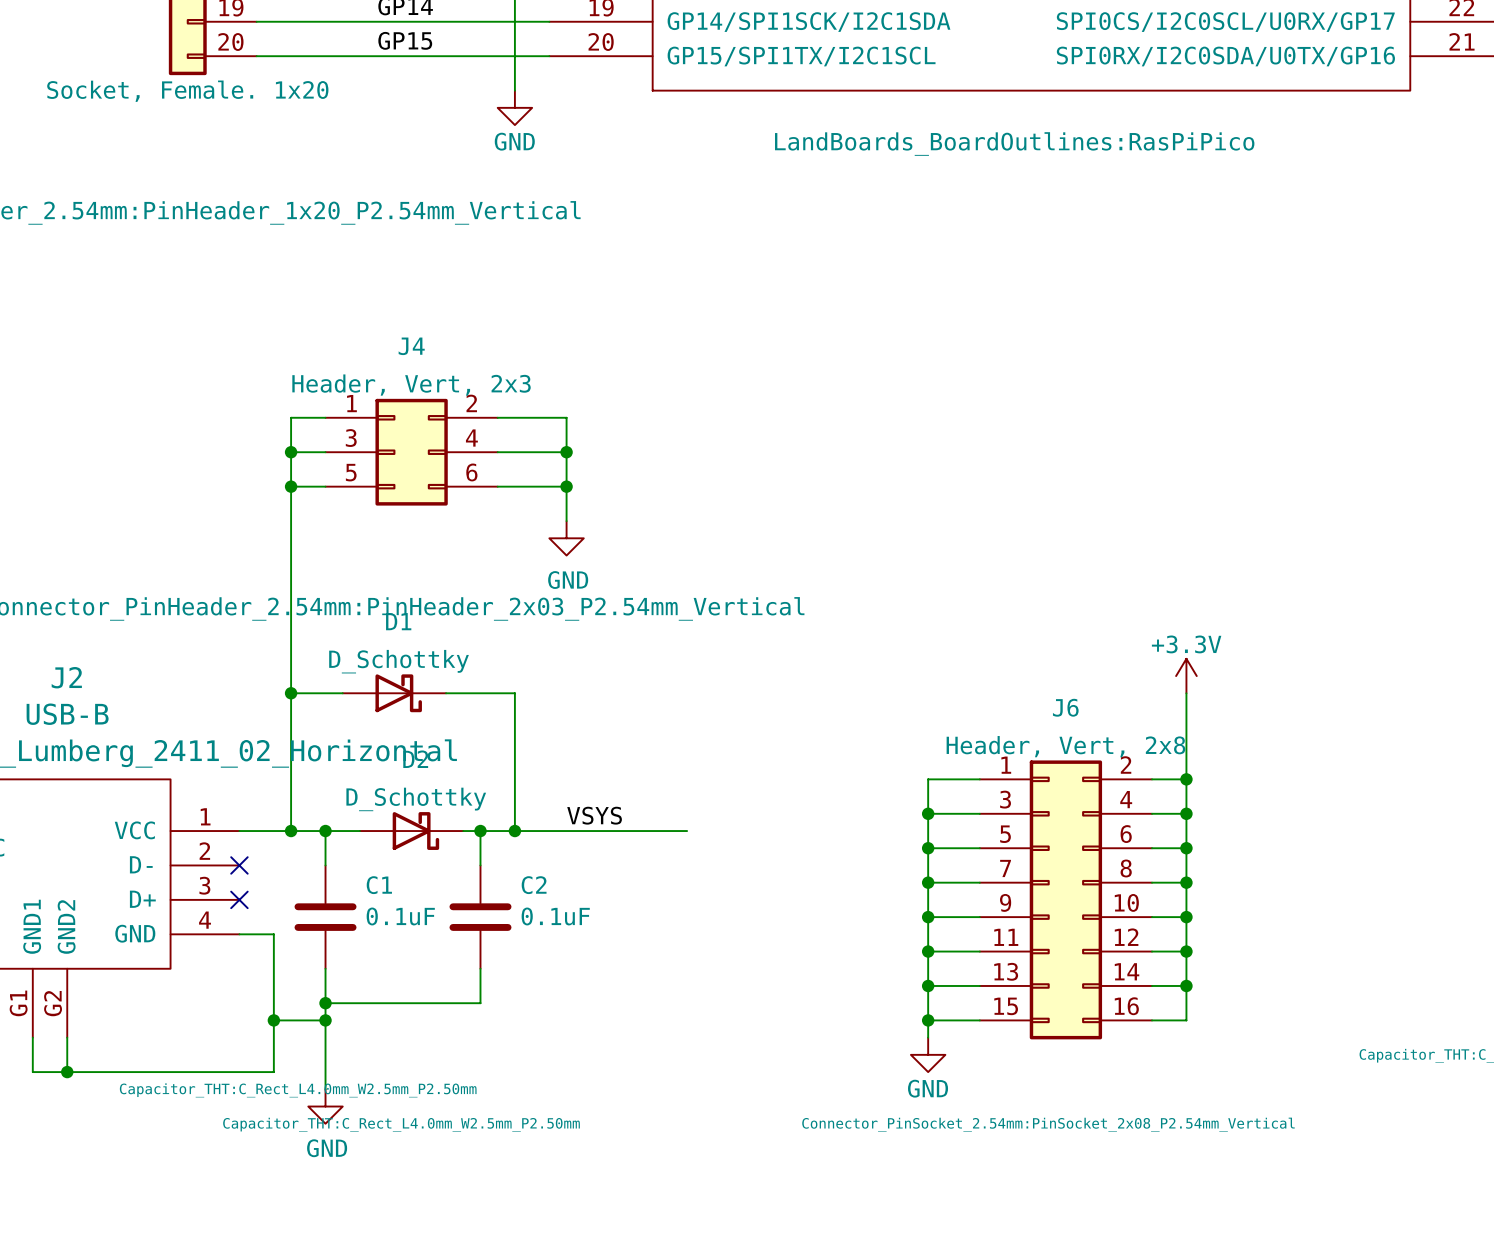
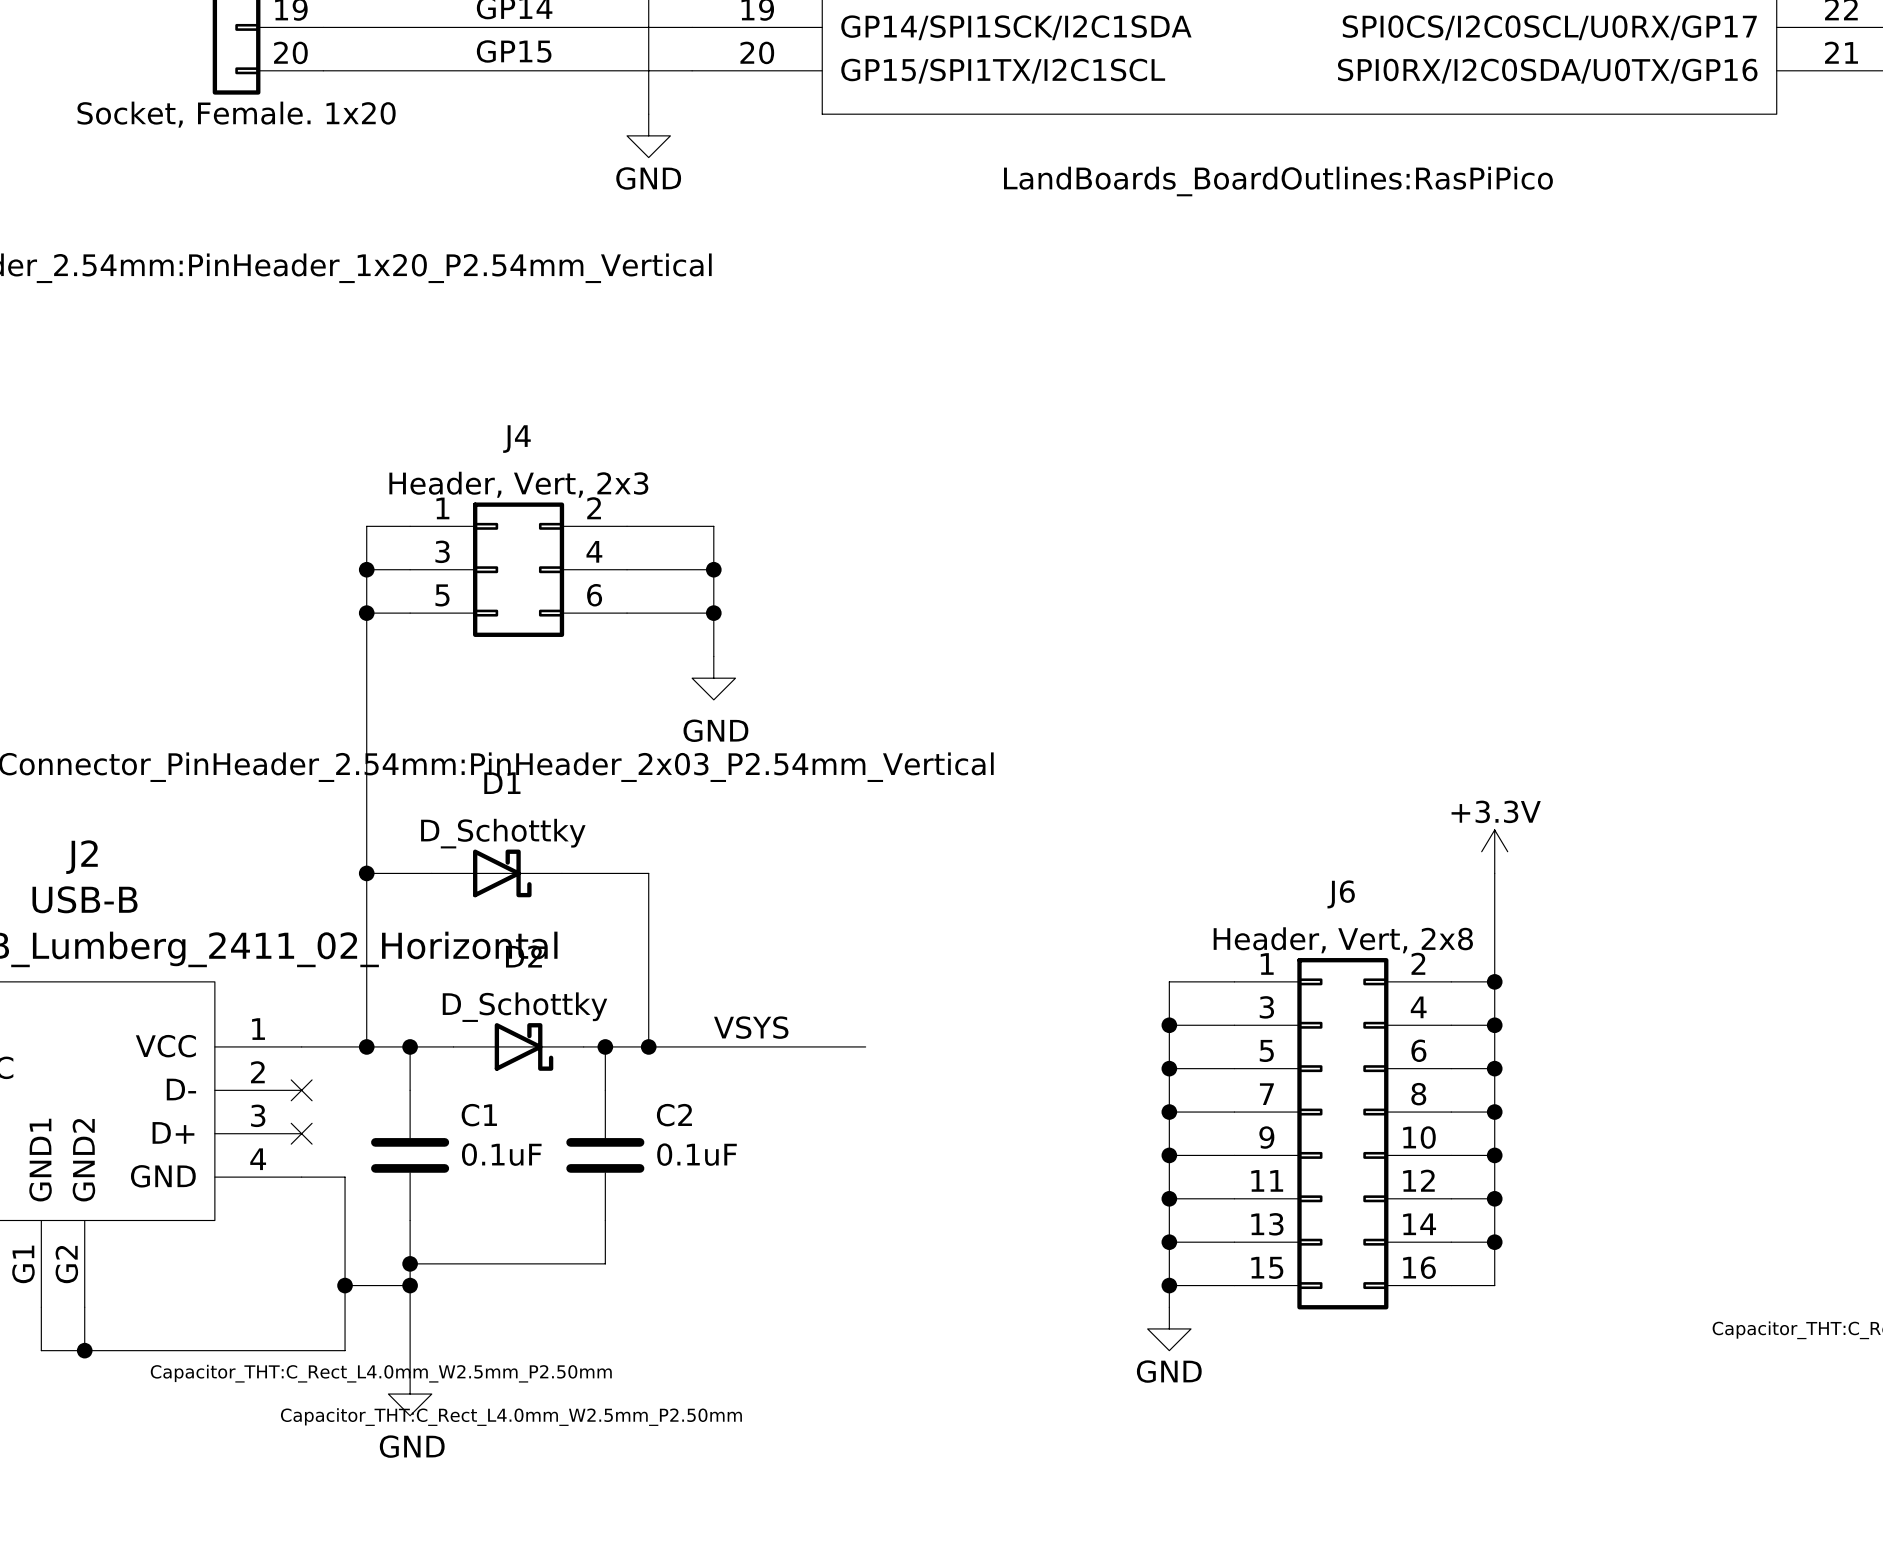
J6 text: Connector_PinSocket_2.54mm:PinSocket_2x08_P2.54mm_Vertical (1048, 1124) -> none

